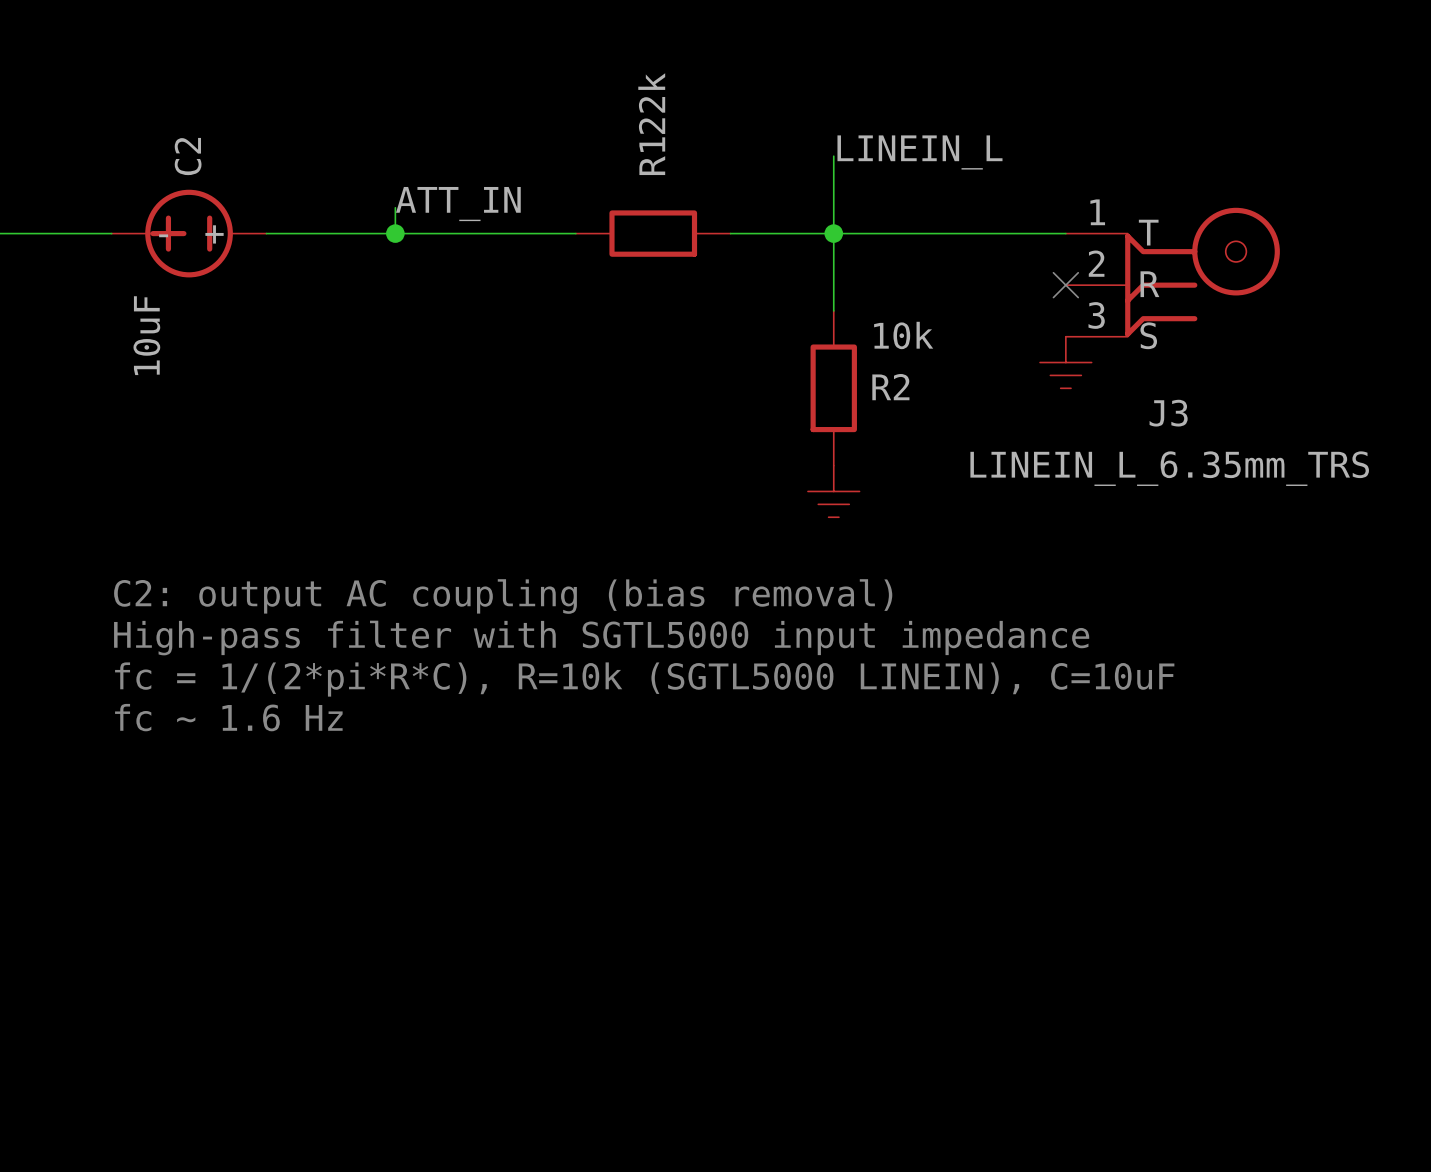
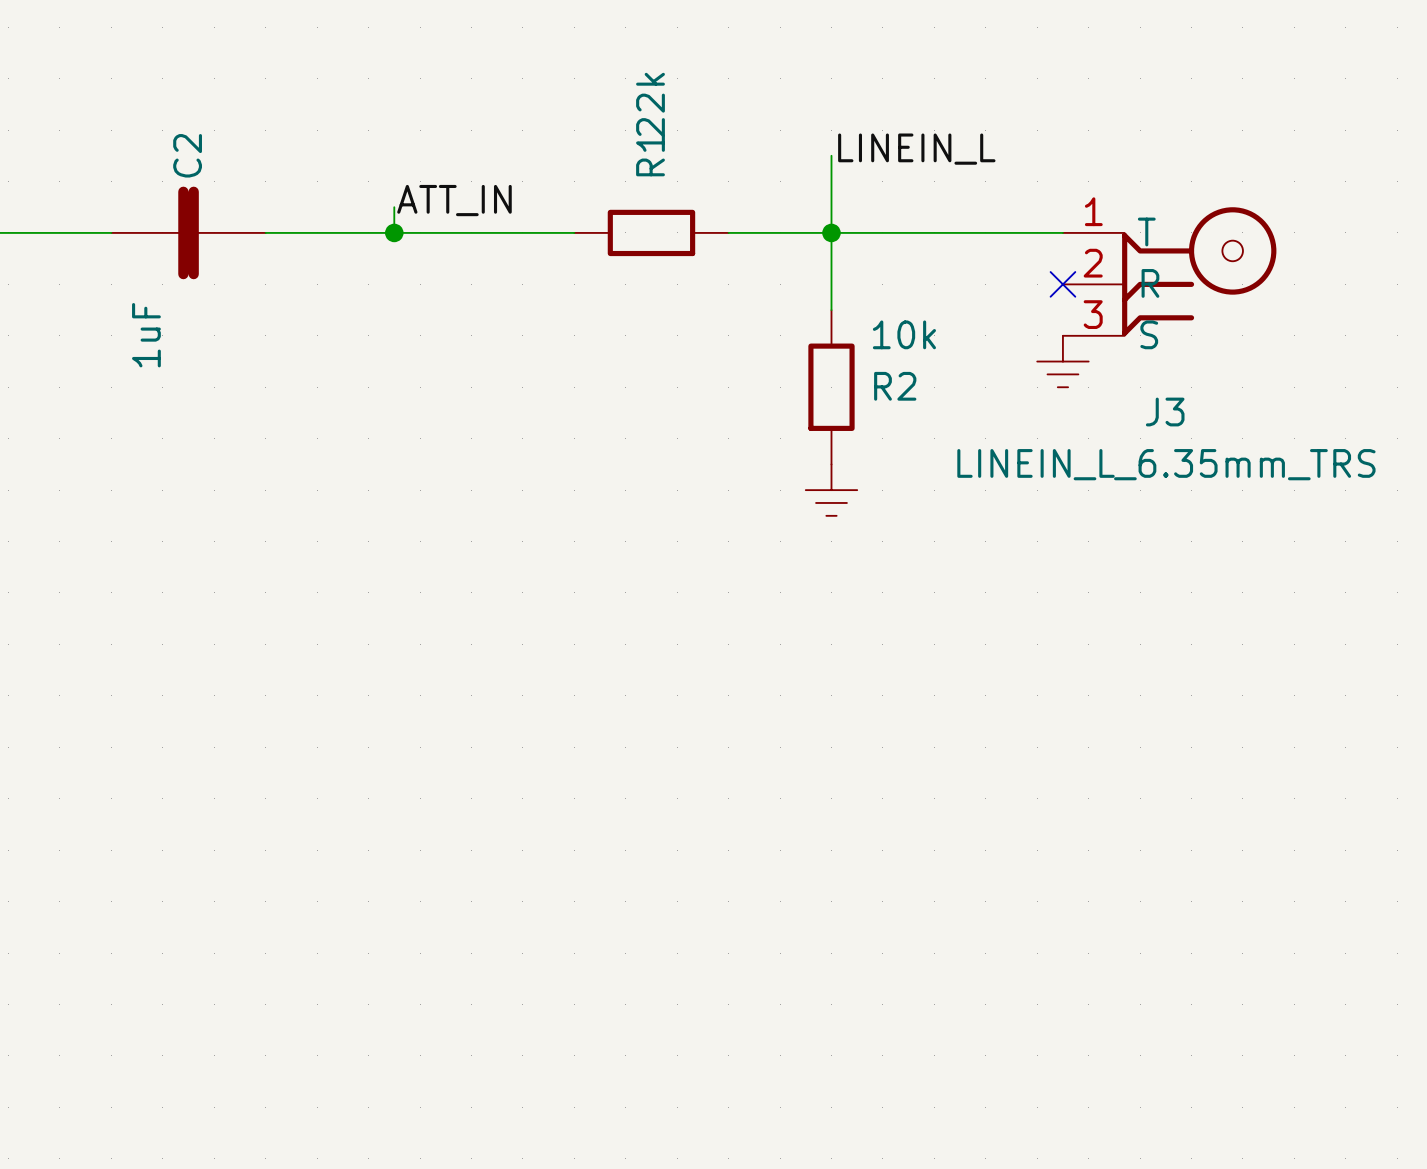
C2 symbol: [111, 189, 267, 278] -> [111, 186, 266, 280]
C2 value: 10uF (146, 335) -> 1uF (146, 335)
text: C2: output AC coupling (bias removal) (503, 596) -> none
text: High-pass filter with SGTL5000 input impedance (601, 638) -> none
text: fc = 1/(2*pi*R*C), R=10k (SGTL5000 LINEIN), C=10uF (644, 679) -> none
text: fc ~ 1.6 Hz (228, 717) -> none

